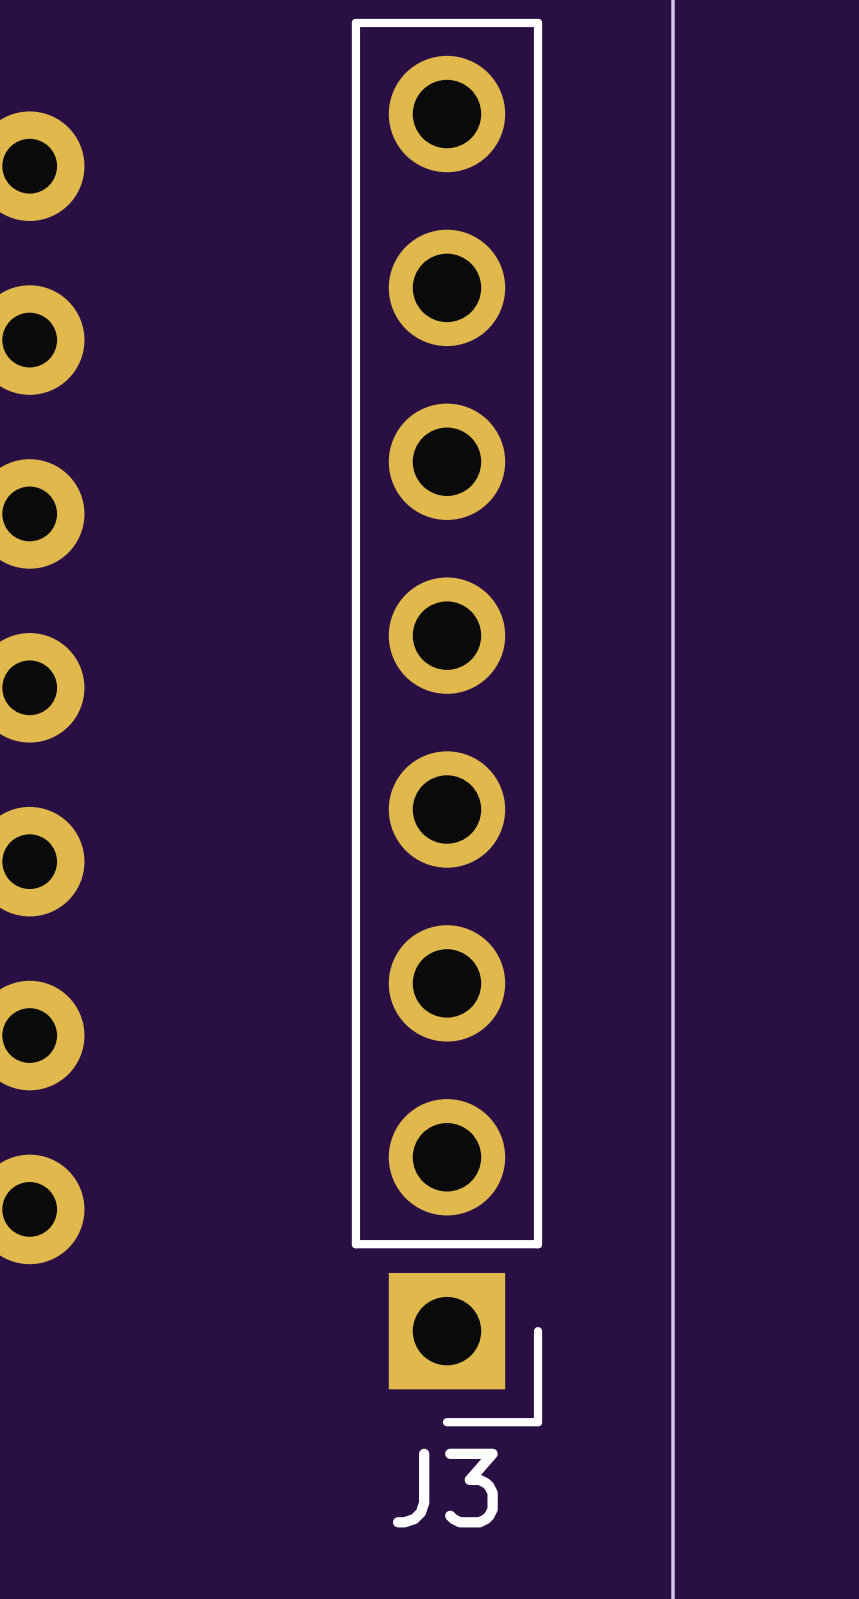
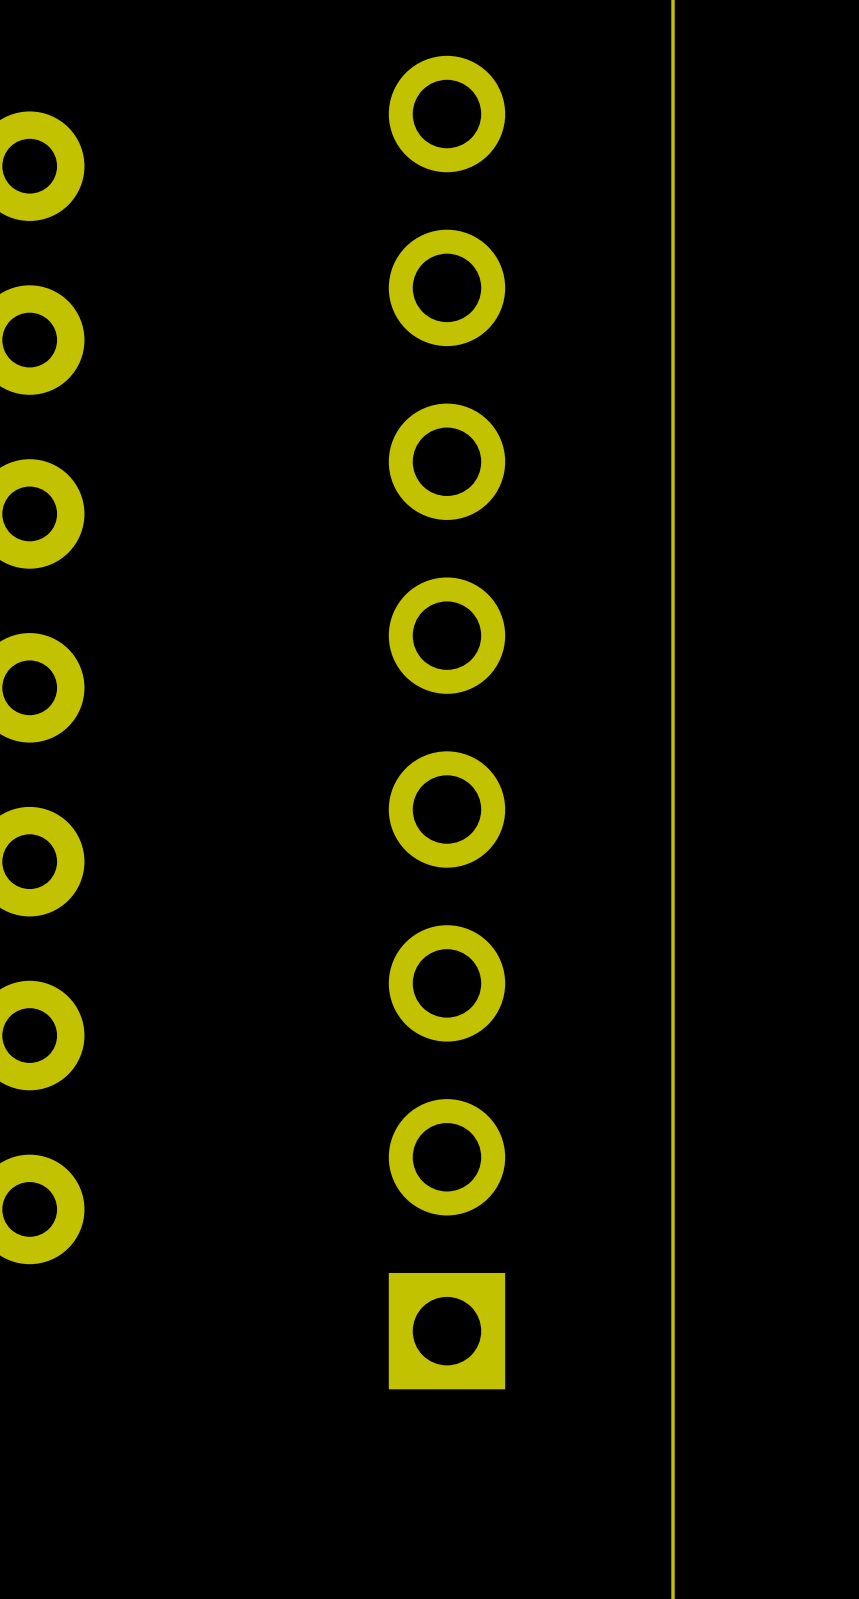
J3 side: bottom (446, 722) -> top (446, 722)

